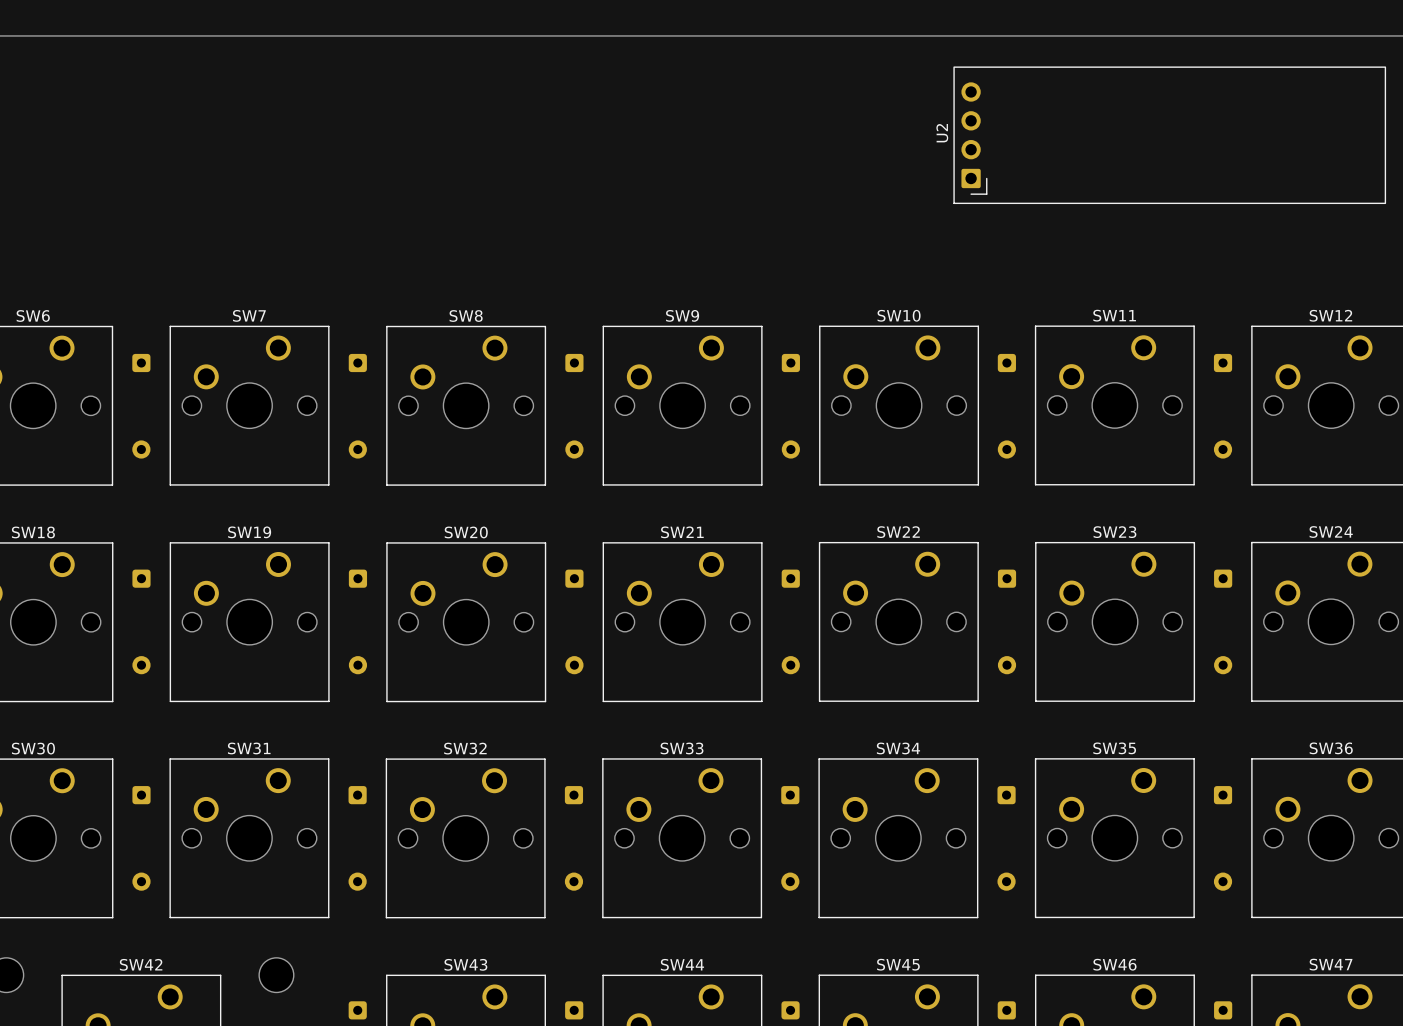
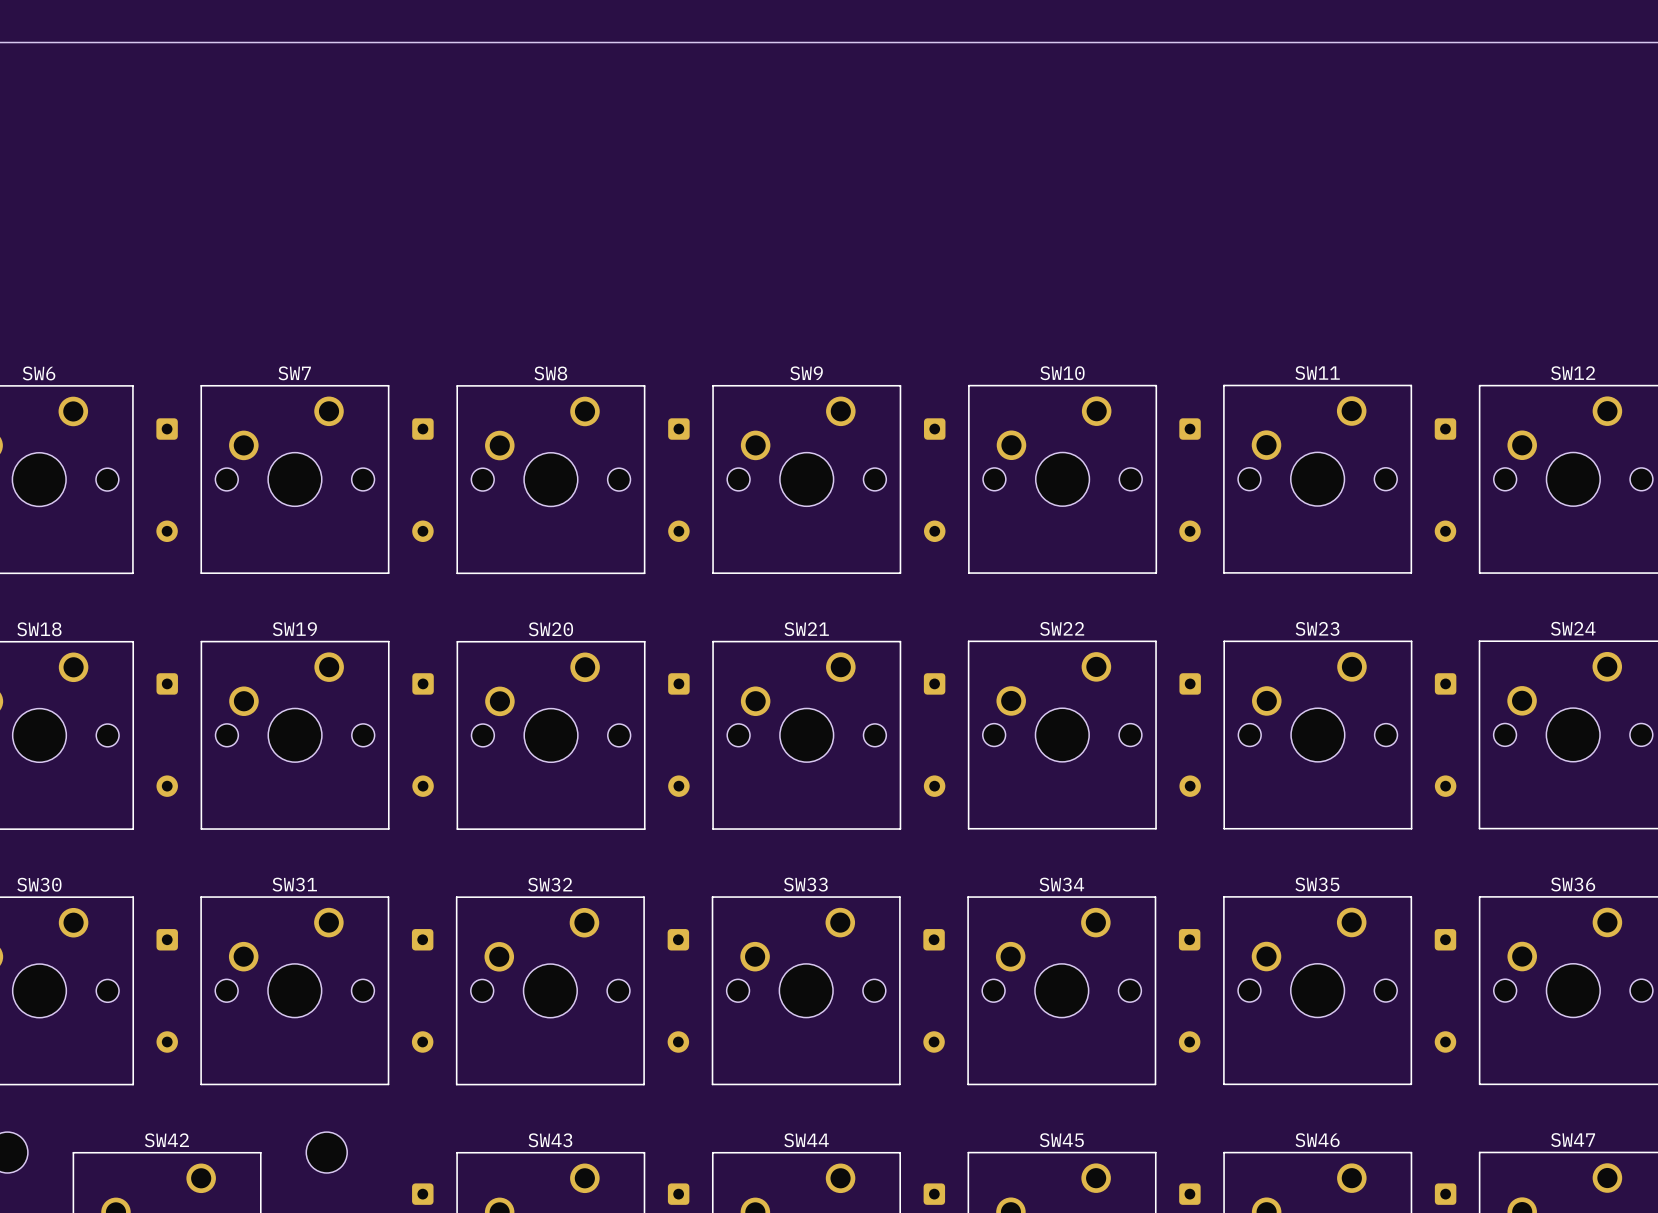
U2: (1169, 135) -> none

